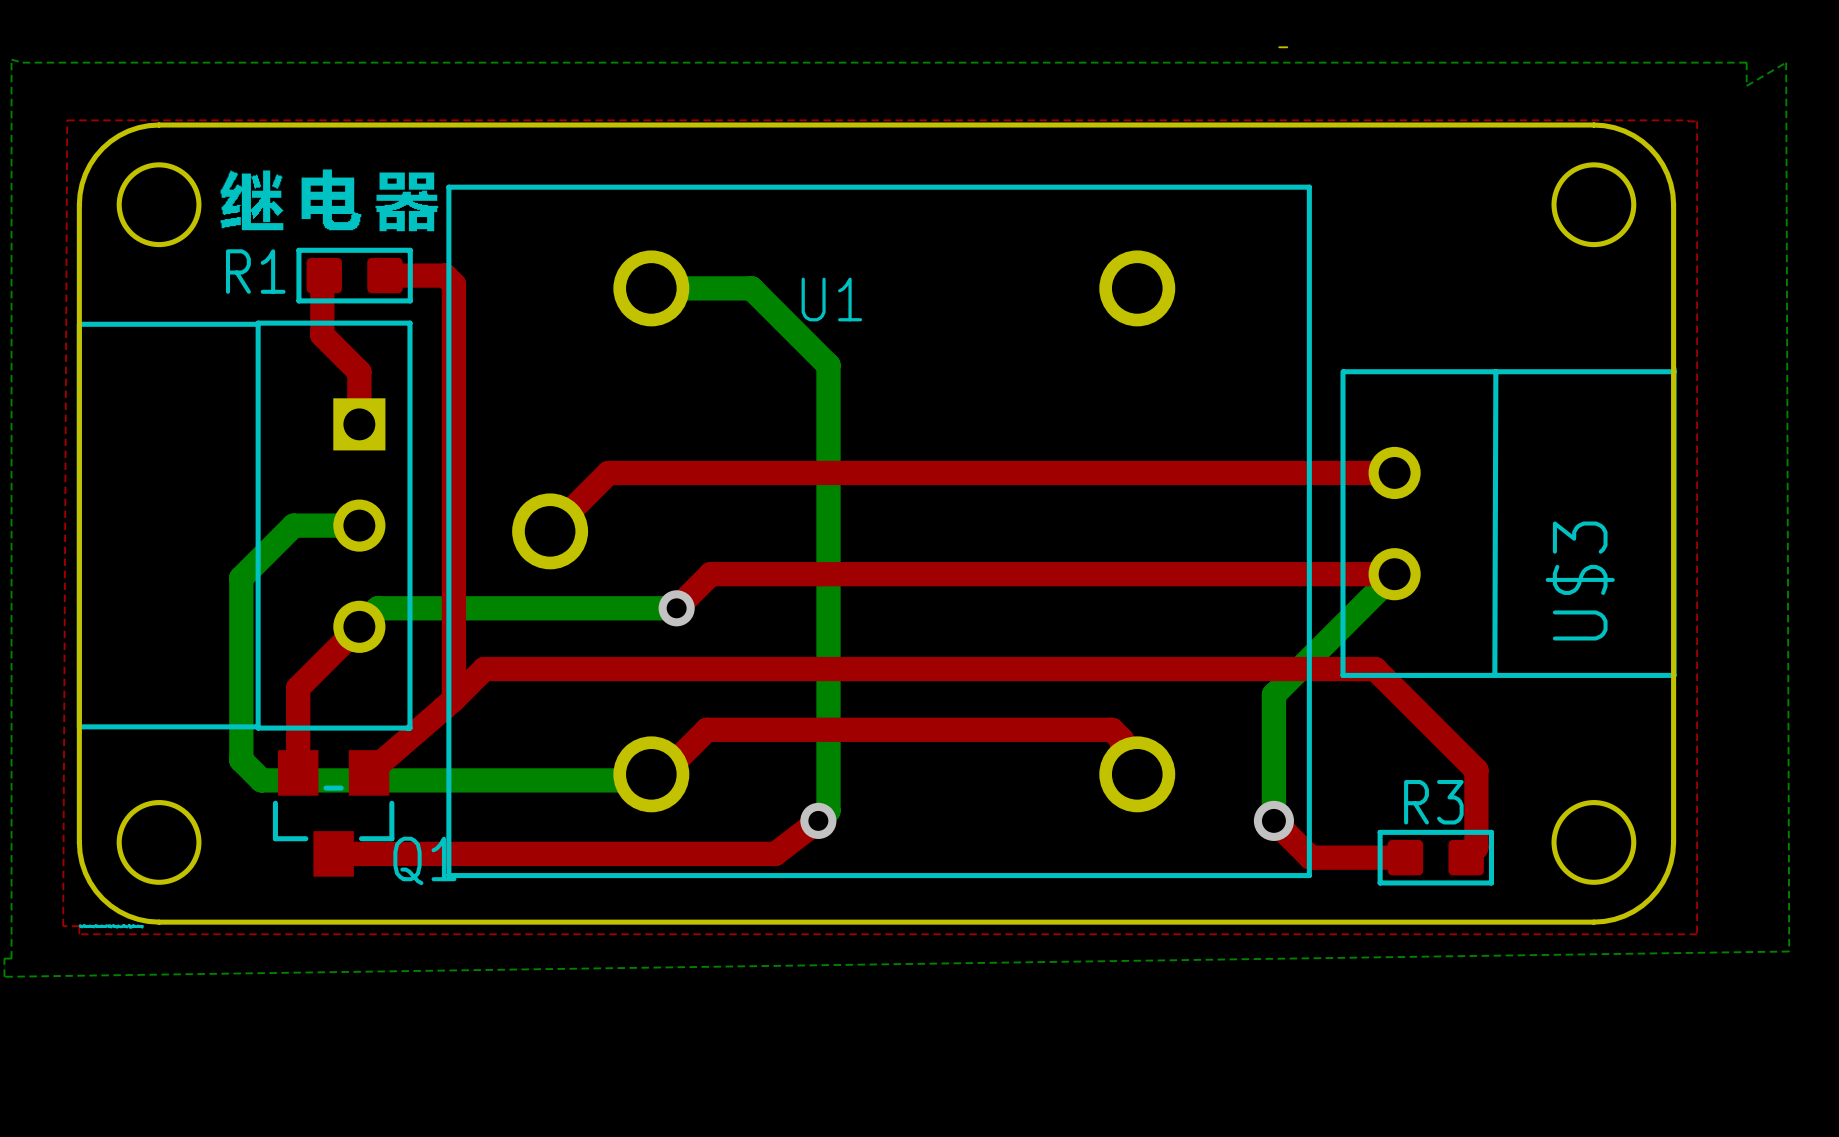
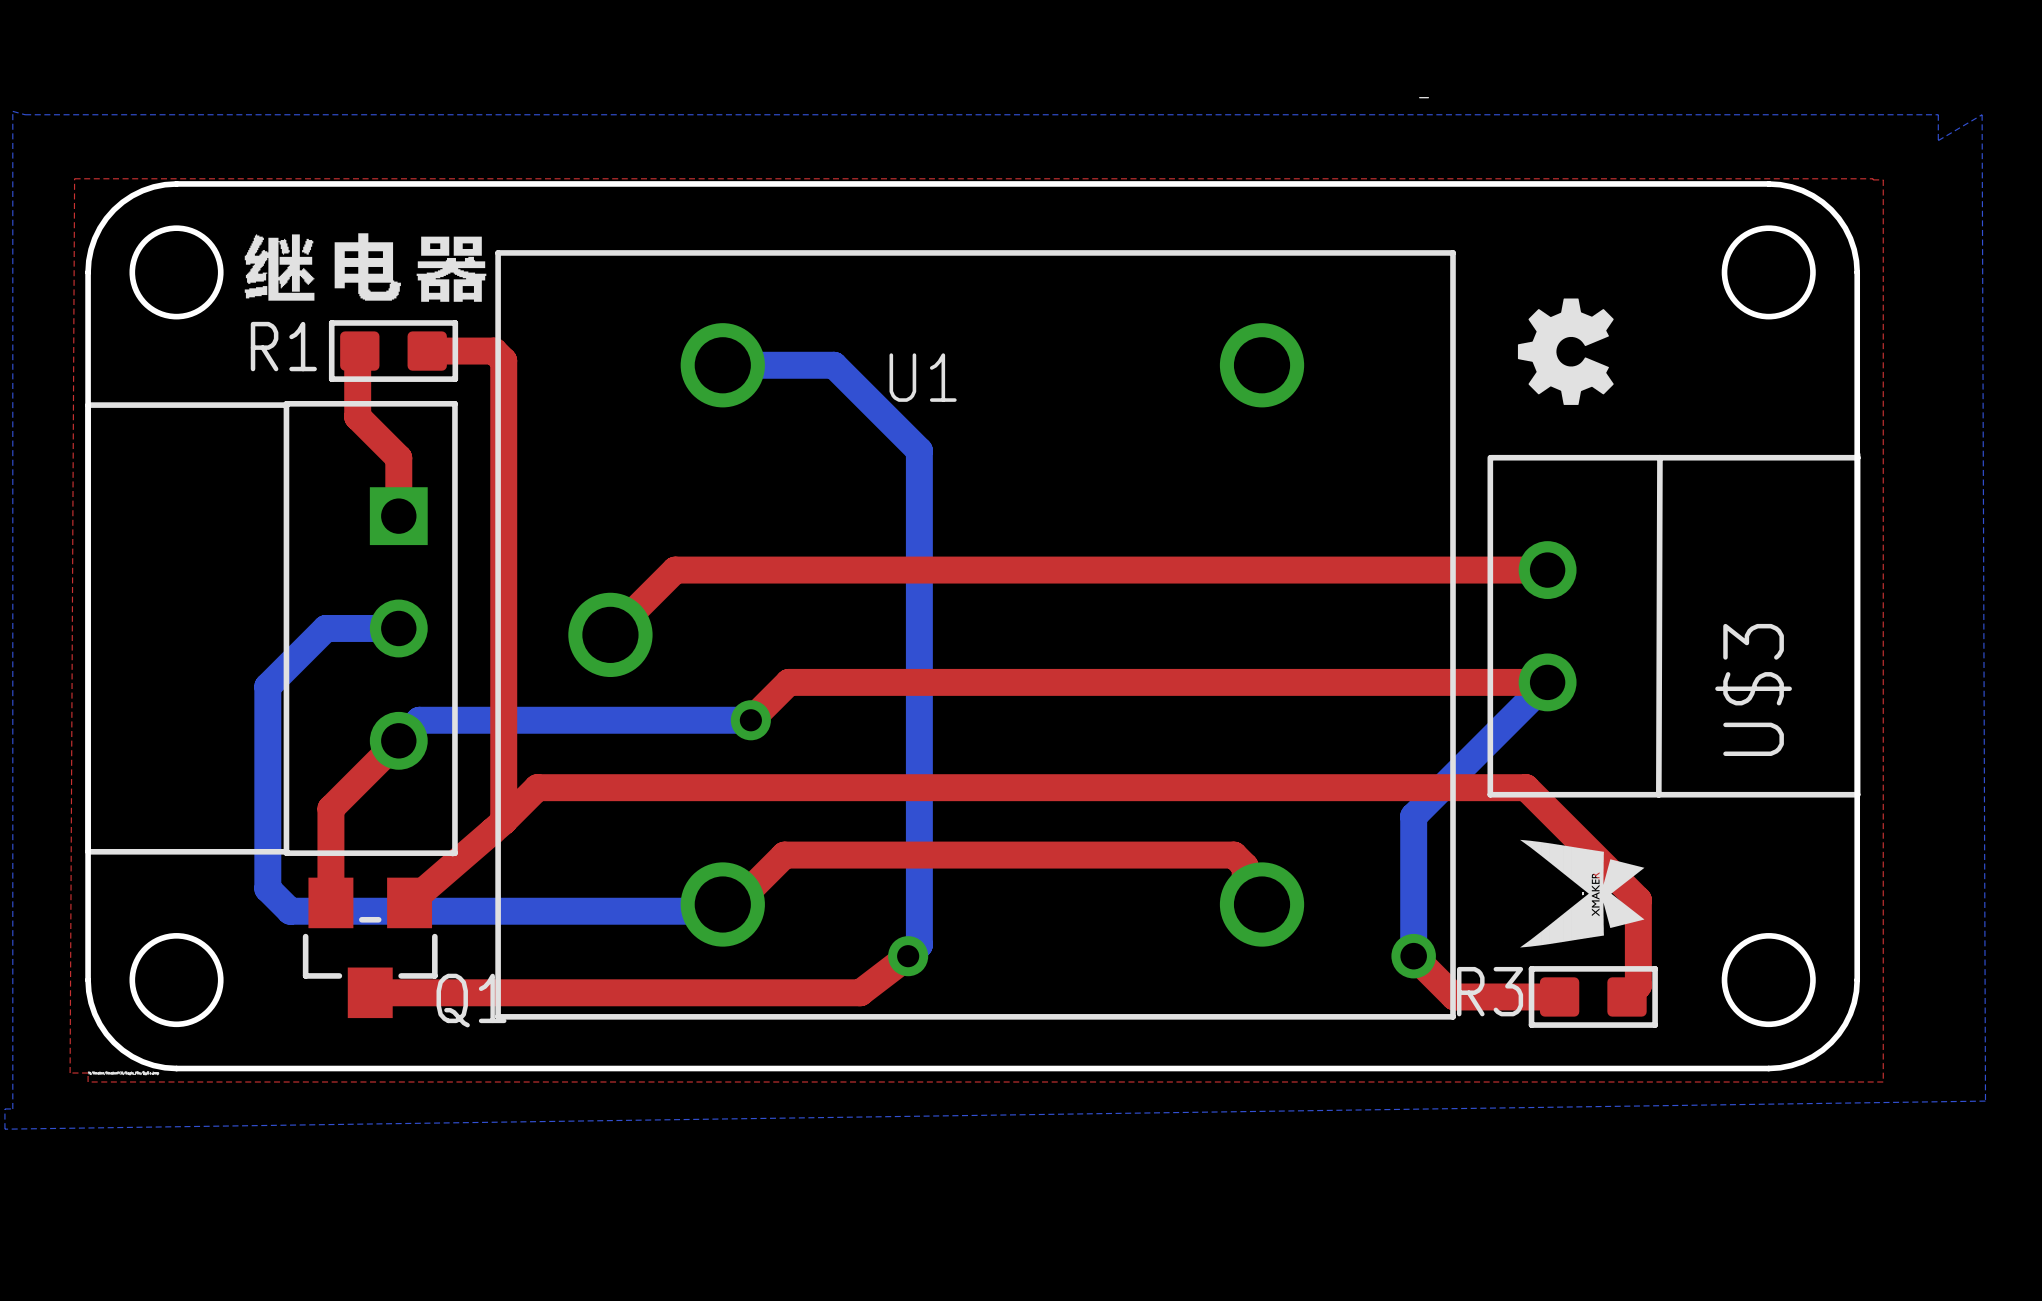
drawing: none -> [1517, 298, 1614, 405]
drawing: none -> [1504, 839, 1645, 948]
R3 name position: R3 (1433, 802) -> R3 (1490, 991)

